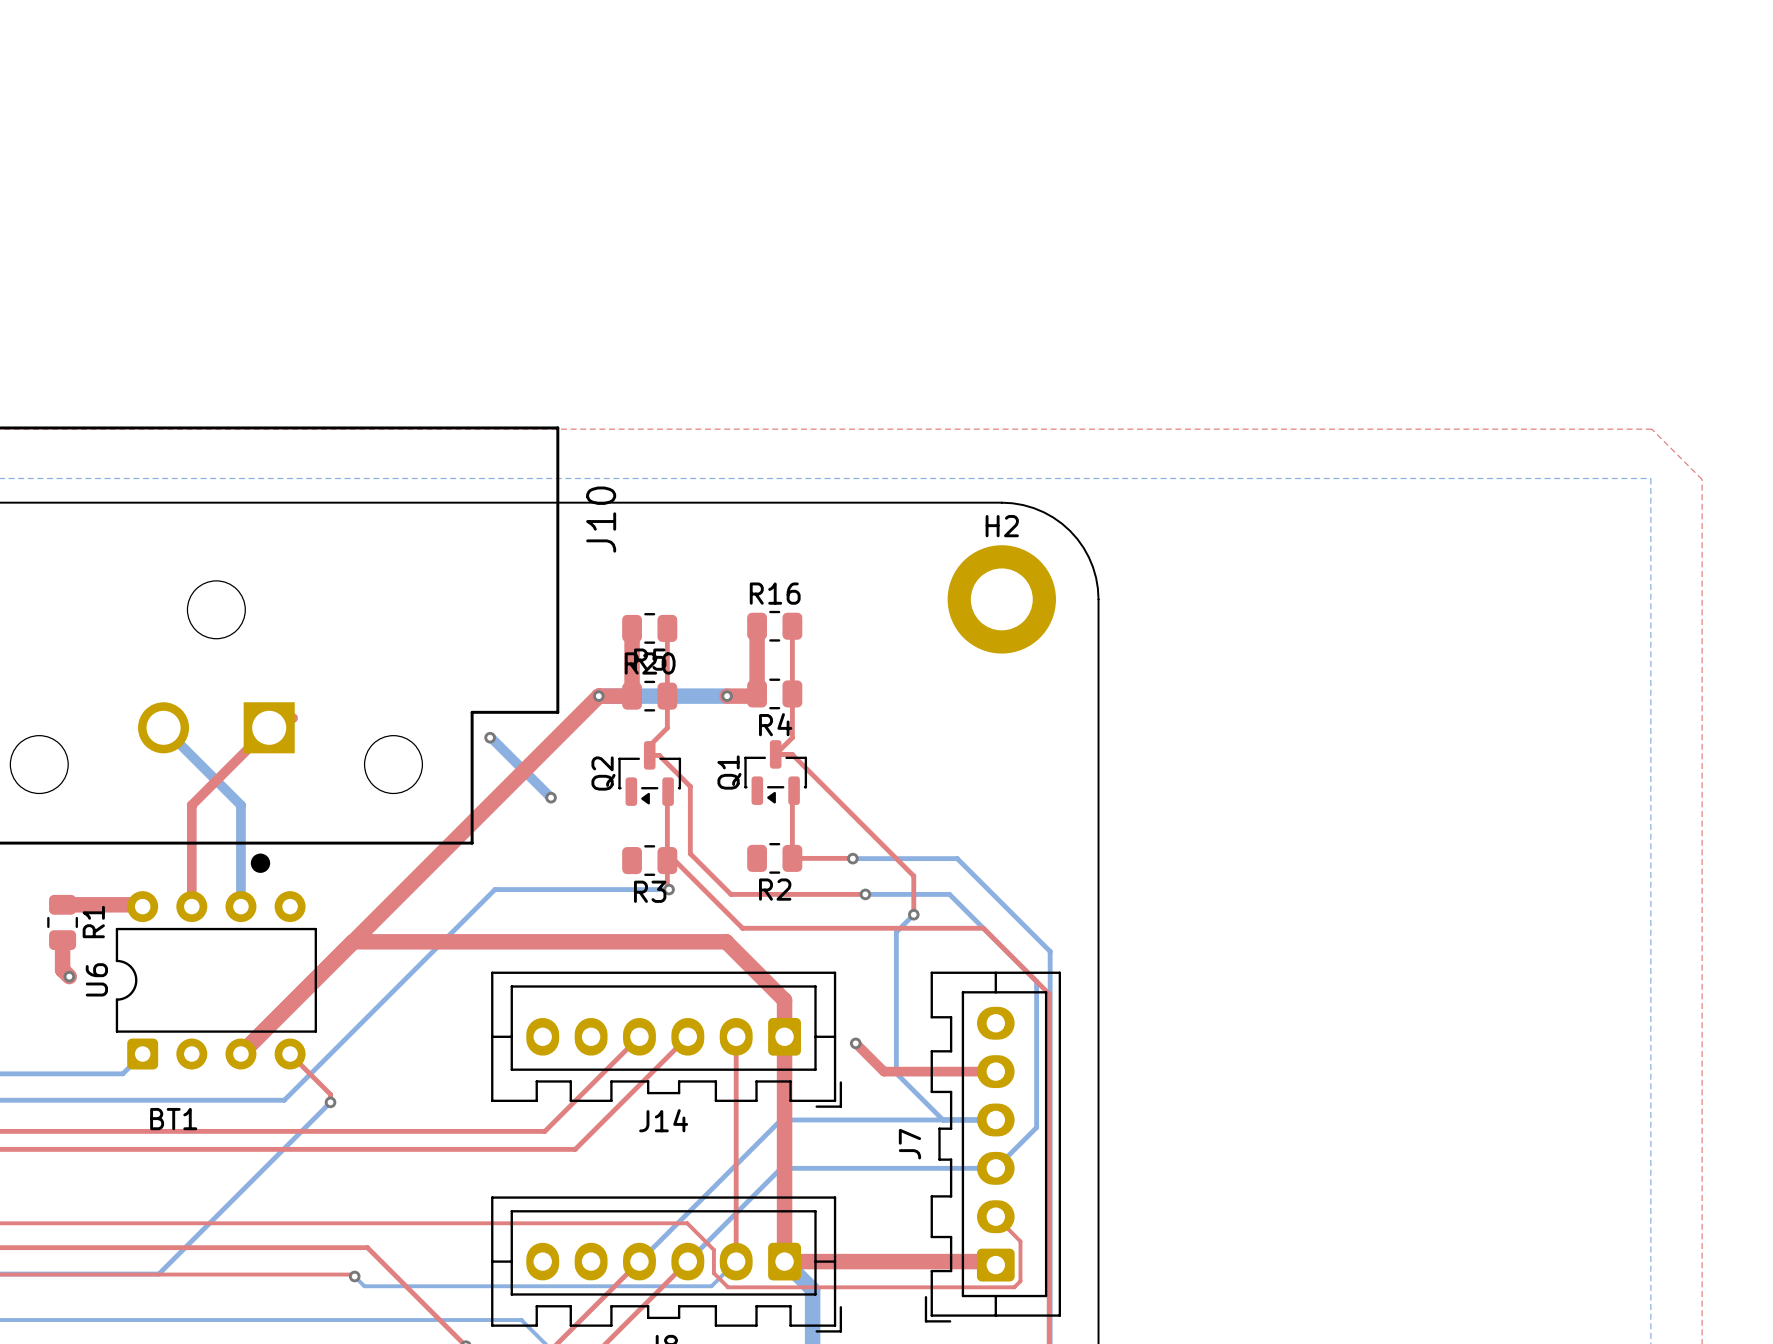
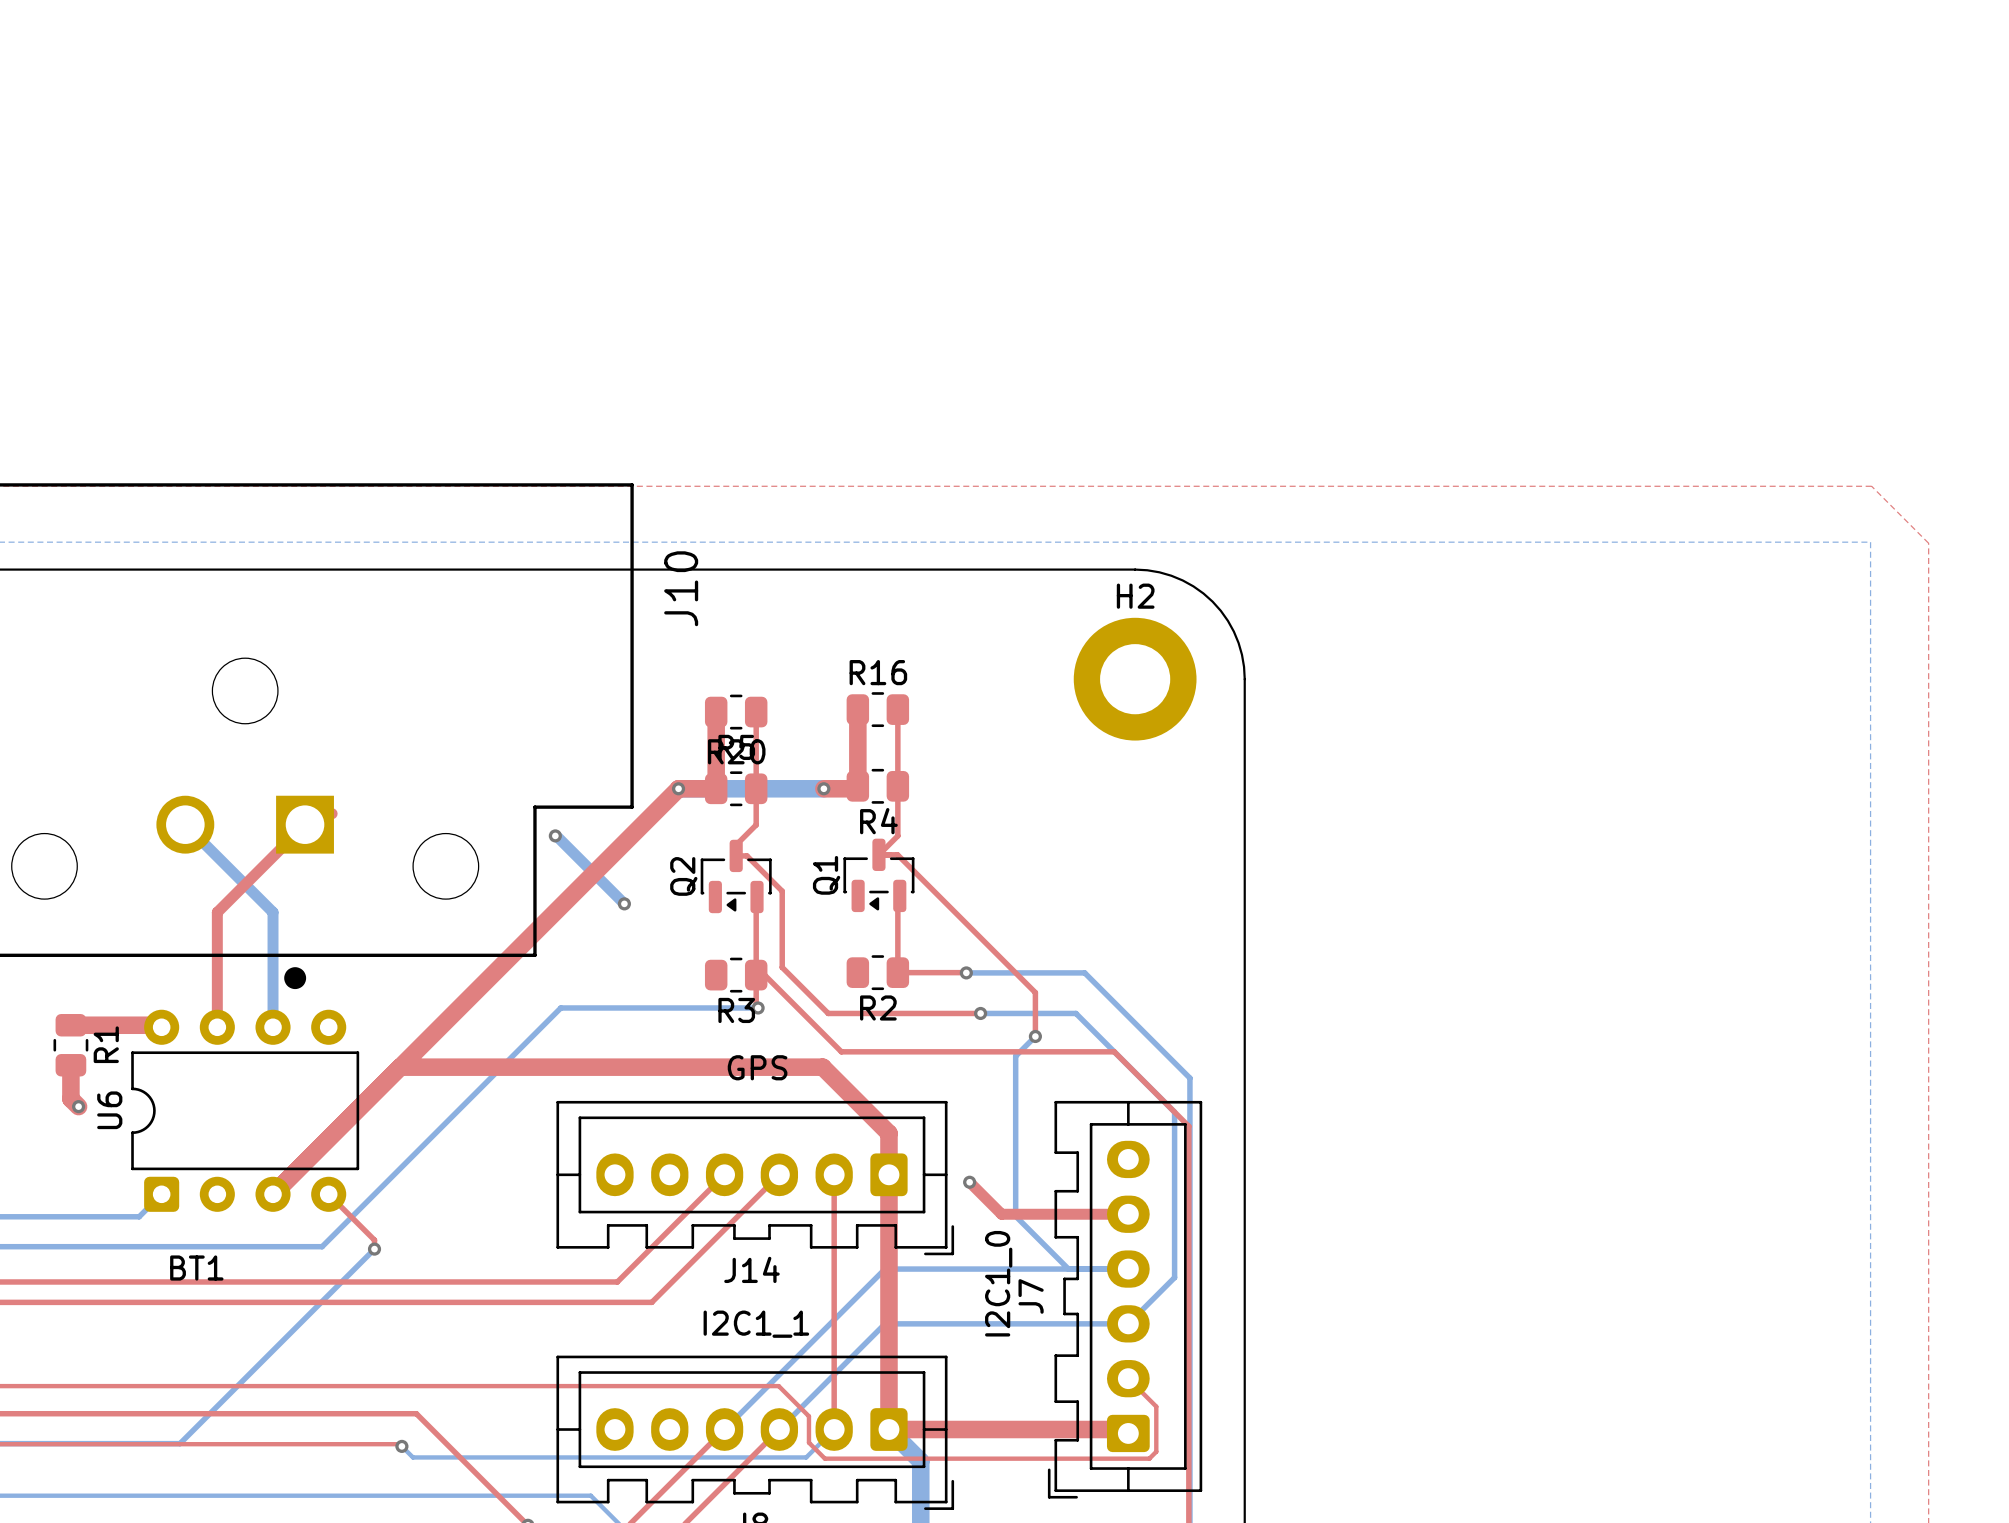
text: none -> GPS (757, 1067)
text: none -> I2C1_0 (998, 1283)
text: none -> I2C1_1 (756, 1324)

